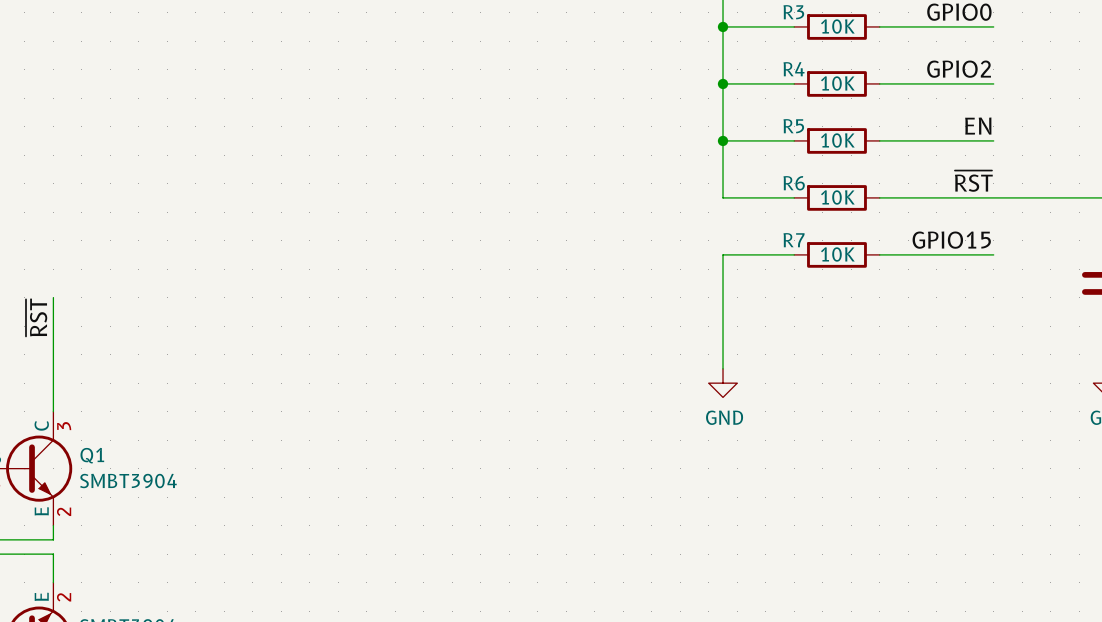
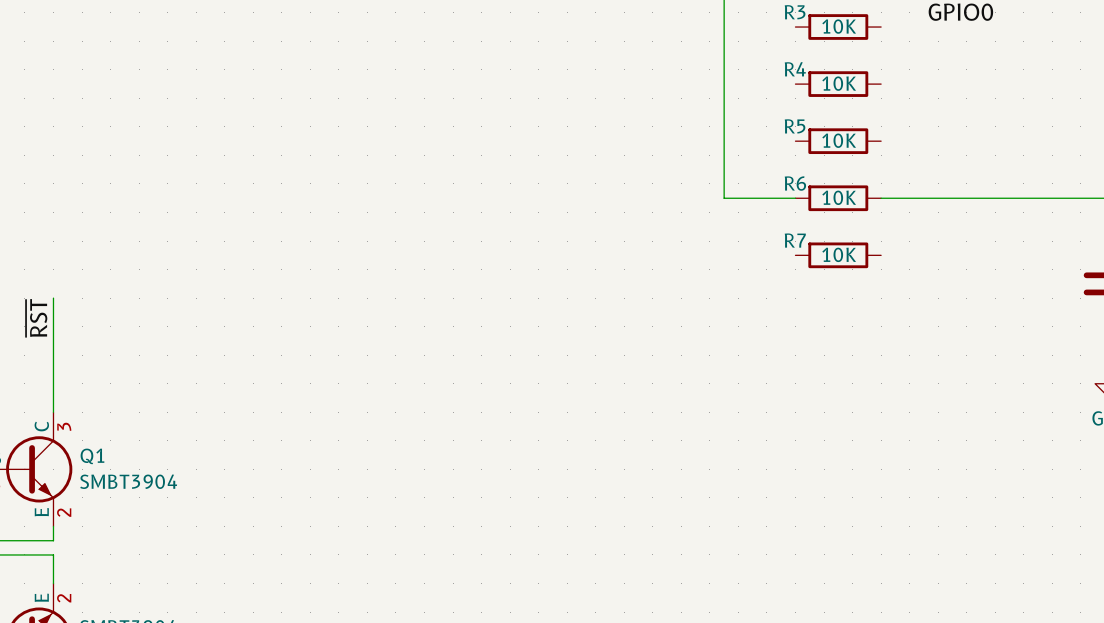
wire: (723, 26) (794, 26) -> none
junction: (723, 26) -> none
wire: (879, 26) (993, 26) -> none
label: GPIO2 (959, 69) -> none
wire: (723, 83) (794, 83) -> none
junction: (723, 83) -> none
wire: (879, 83) (993, 83) -> none
label: EN (978, 126) -> none
wire: (723, 140) (794, 140) -> none
junction: (723, 140) -> none
wire: (879, 140) (993, 140) -> none
label: ~{RST} (973, 181) -> none
label: GPIO15 (951, 240) -> none
wire: (794, 254) (723, 254) (723, 368) -> none
wire: (879, 254) (993, 254) -> none
power symbol: GND (723, 383) -> none

